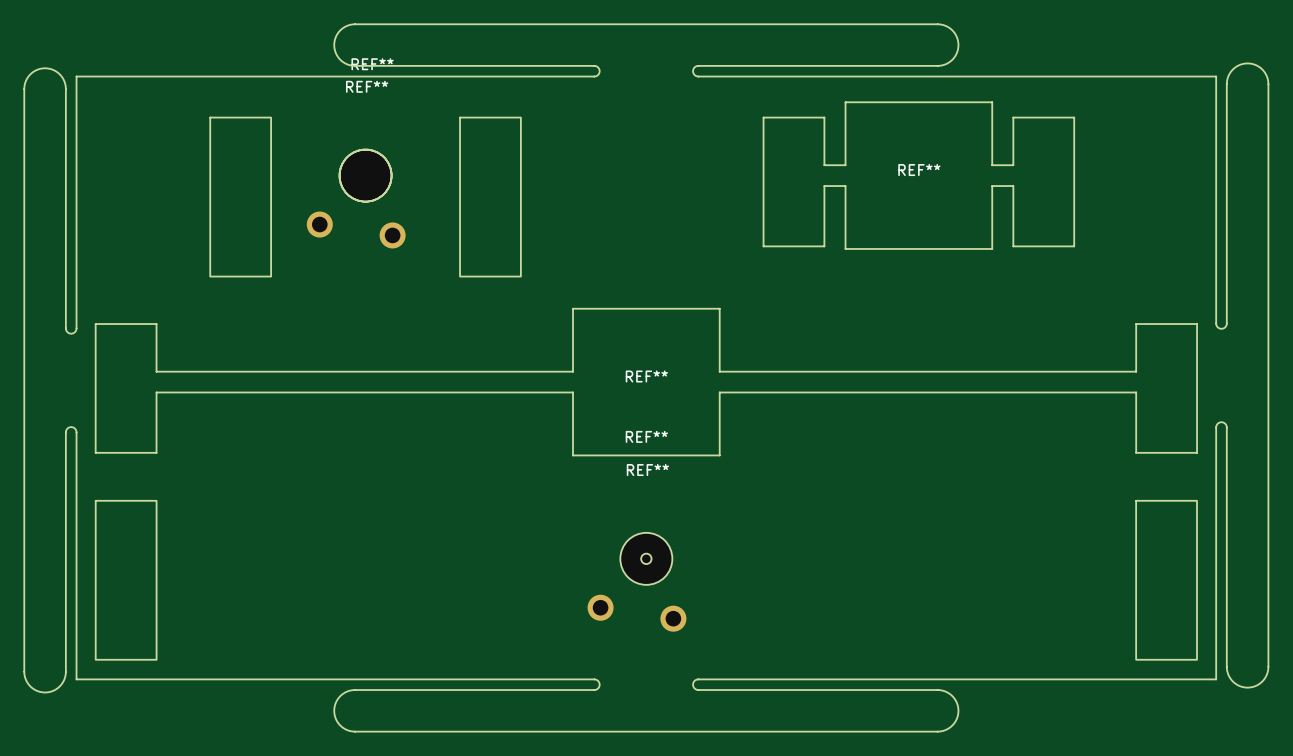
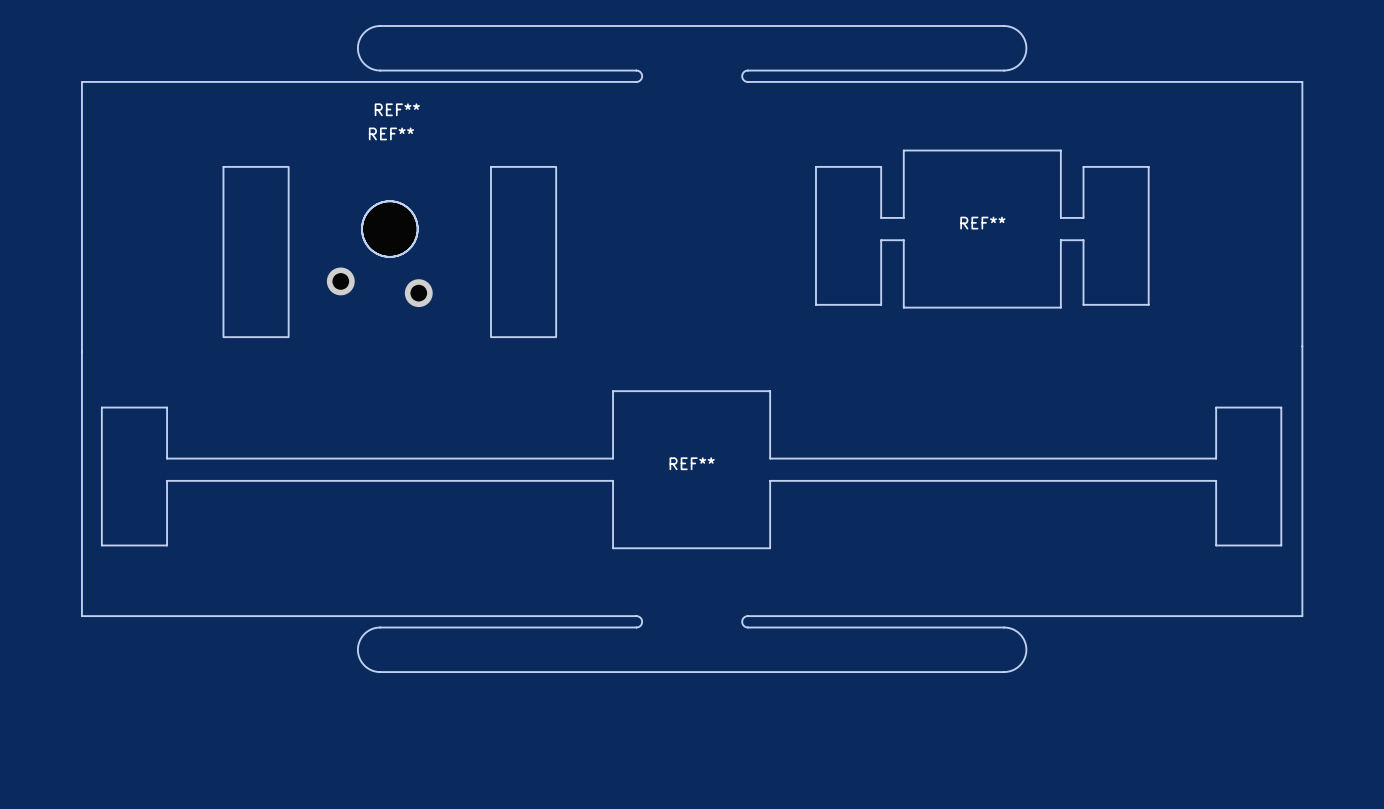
REF** position: (918, 175) -> (982, 229)
REF** position: (365, 197) -> (389, 252)
REF** position: (356, 199) -> (379, 254)
board edge: (1216, 323) (1217, 327) (1221, 328) (1225, 327) (1226, 323) (1226, 81) (1229, 73) (1234, 67) (1242, 64) (1250, 63) (1262, 69) (1266, 76) (1268, 84) (1268, 666) (1263, 680) (1250, 687) (1242, 687) (1233, 682) (1226, 669) (1226, 427) (1225, 423) (1221, 422) (1217, 423) (1216, 427) -> (1302, 346) (1302, 457)
board edge: (76, 328) (74, 332) (71, 333) (67, 332) (65, 328) (65, 86) (62, 77) (56, 71) (42, 68) (29, 75) (24, 89) (24, 671) (25, 679) (30, 686) (42, 692) (50, 691) (57, 688) (63, 682) (65, 674) (65, 432) (67, 428) (71, 427) (75, 428) (76, 432) -> (81, 351) (81, 463)
REF** position: (646, 382) -> (691, 469)
board edge: (76, 575) (76, 679) (594, 679) (599, 684) (598, 688) (594, 690) (350, 690) (337, 699) (334, 713) (341, 726) (355, 731) (940, 731) (952, 725) (956, 718) (958, 710) (956, 702) (952, 696) (940, 690) (698, 690) (694, 688) (693, 683) (698, 679) (1216, 679) (1216, 575) -> (81, 616) (636, 616) (642, 621) (640, 625) (636, 627) (374, 628) (361, 637) (358, 652) (365, 666) (380, 672) (1004, 672) (1012, 670) (1019, 665) (1024, 658) (1026, 649) (1024, 641) (1019, 634) (1007, 627) (747, 627) (743, 625) (742, 620) (747, 616) (1302, 616)
REF**: (646, 580) -> none
REF**: (636, 582) -> none

